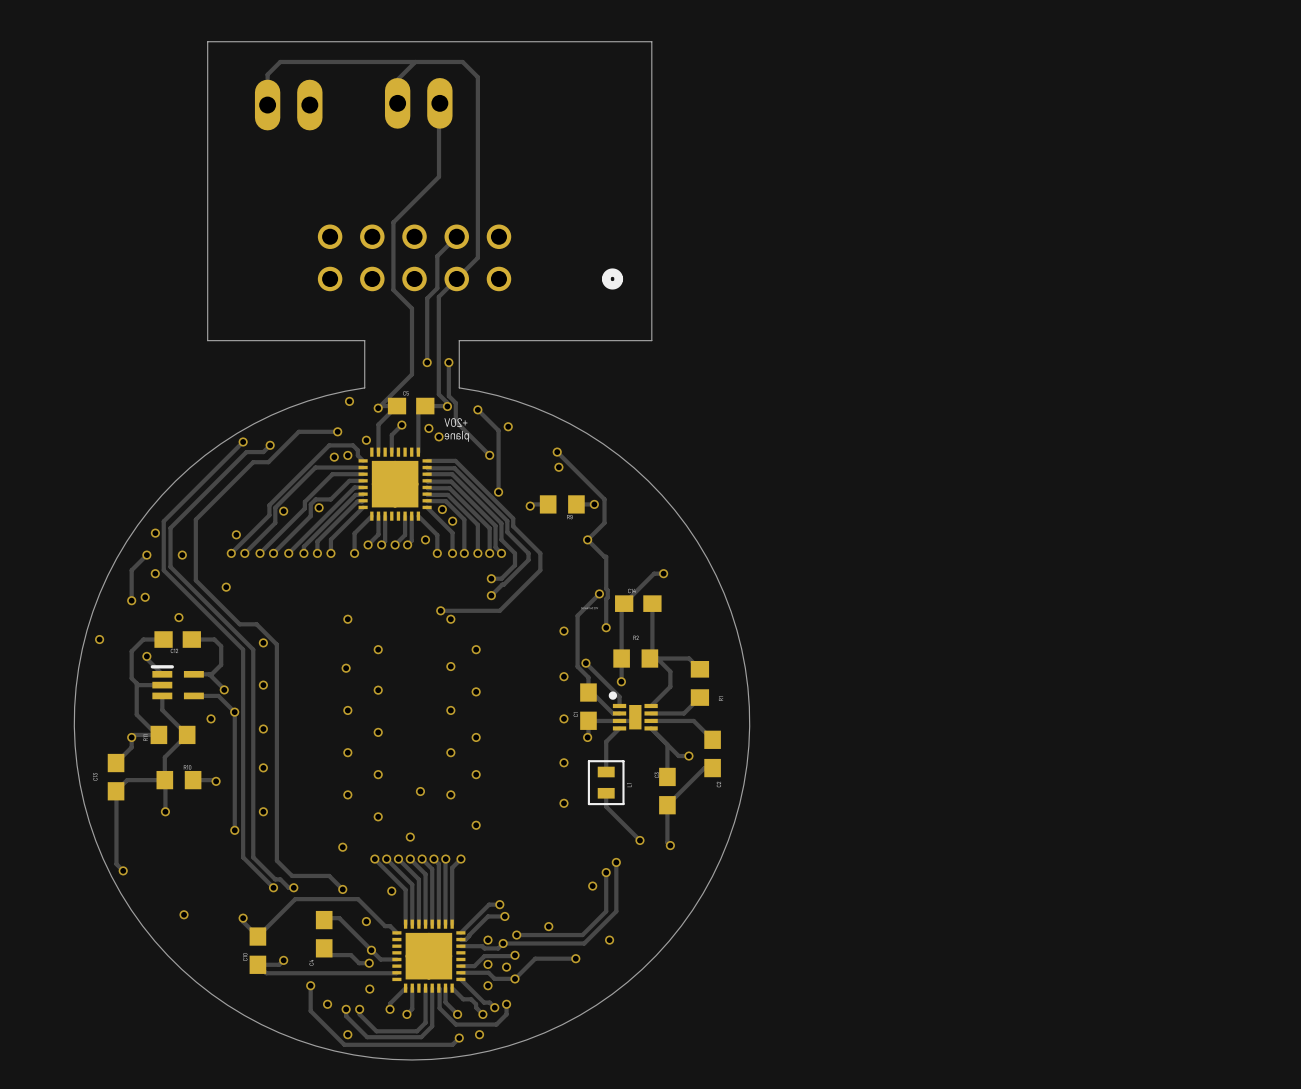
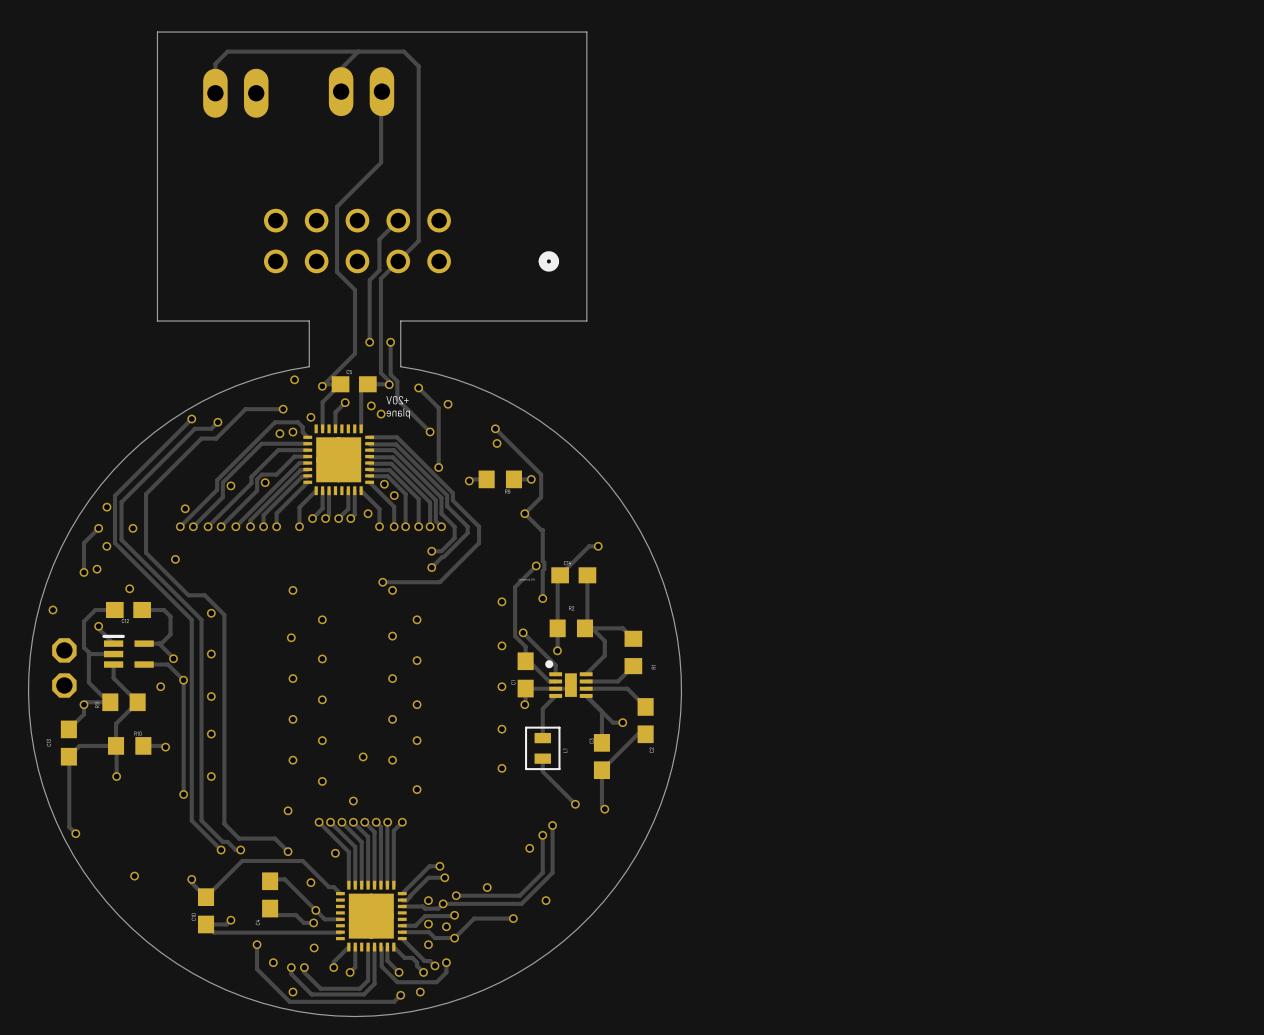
part: none -> (64, 650)
part: none -> (64, 685)

